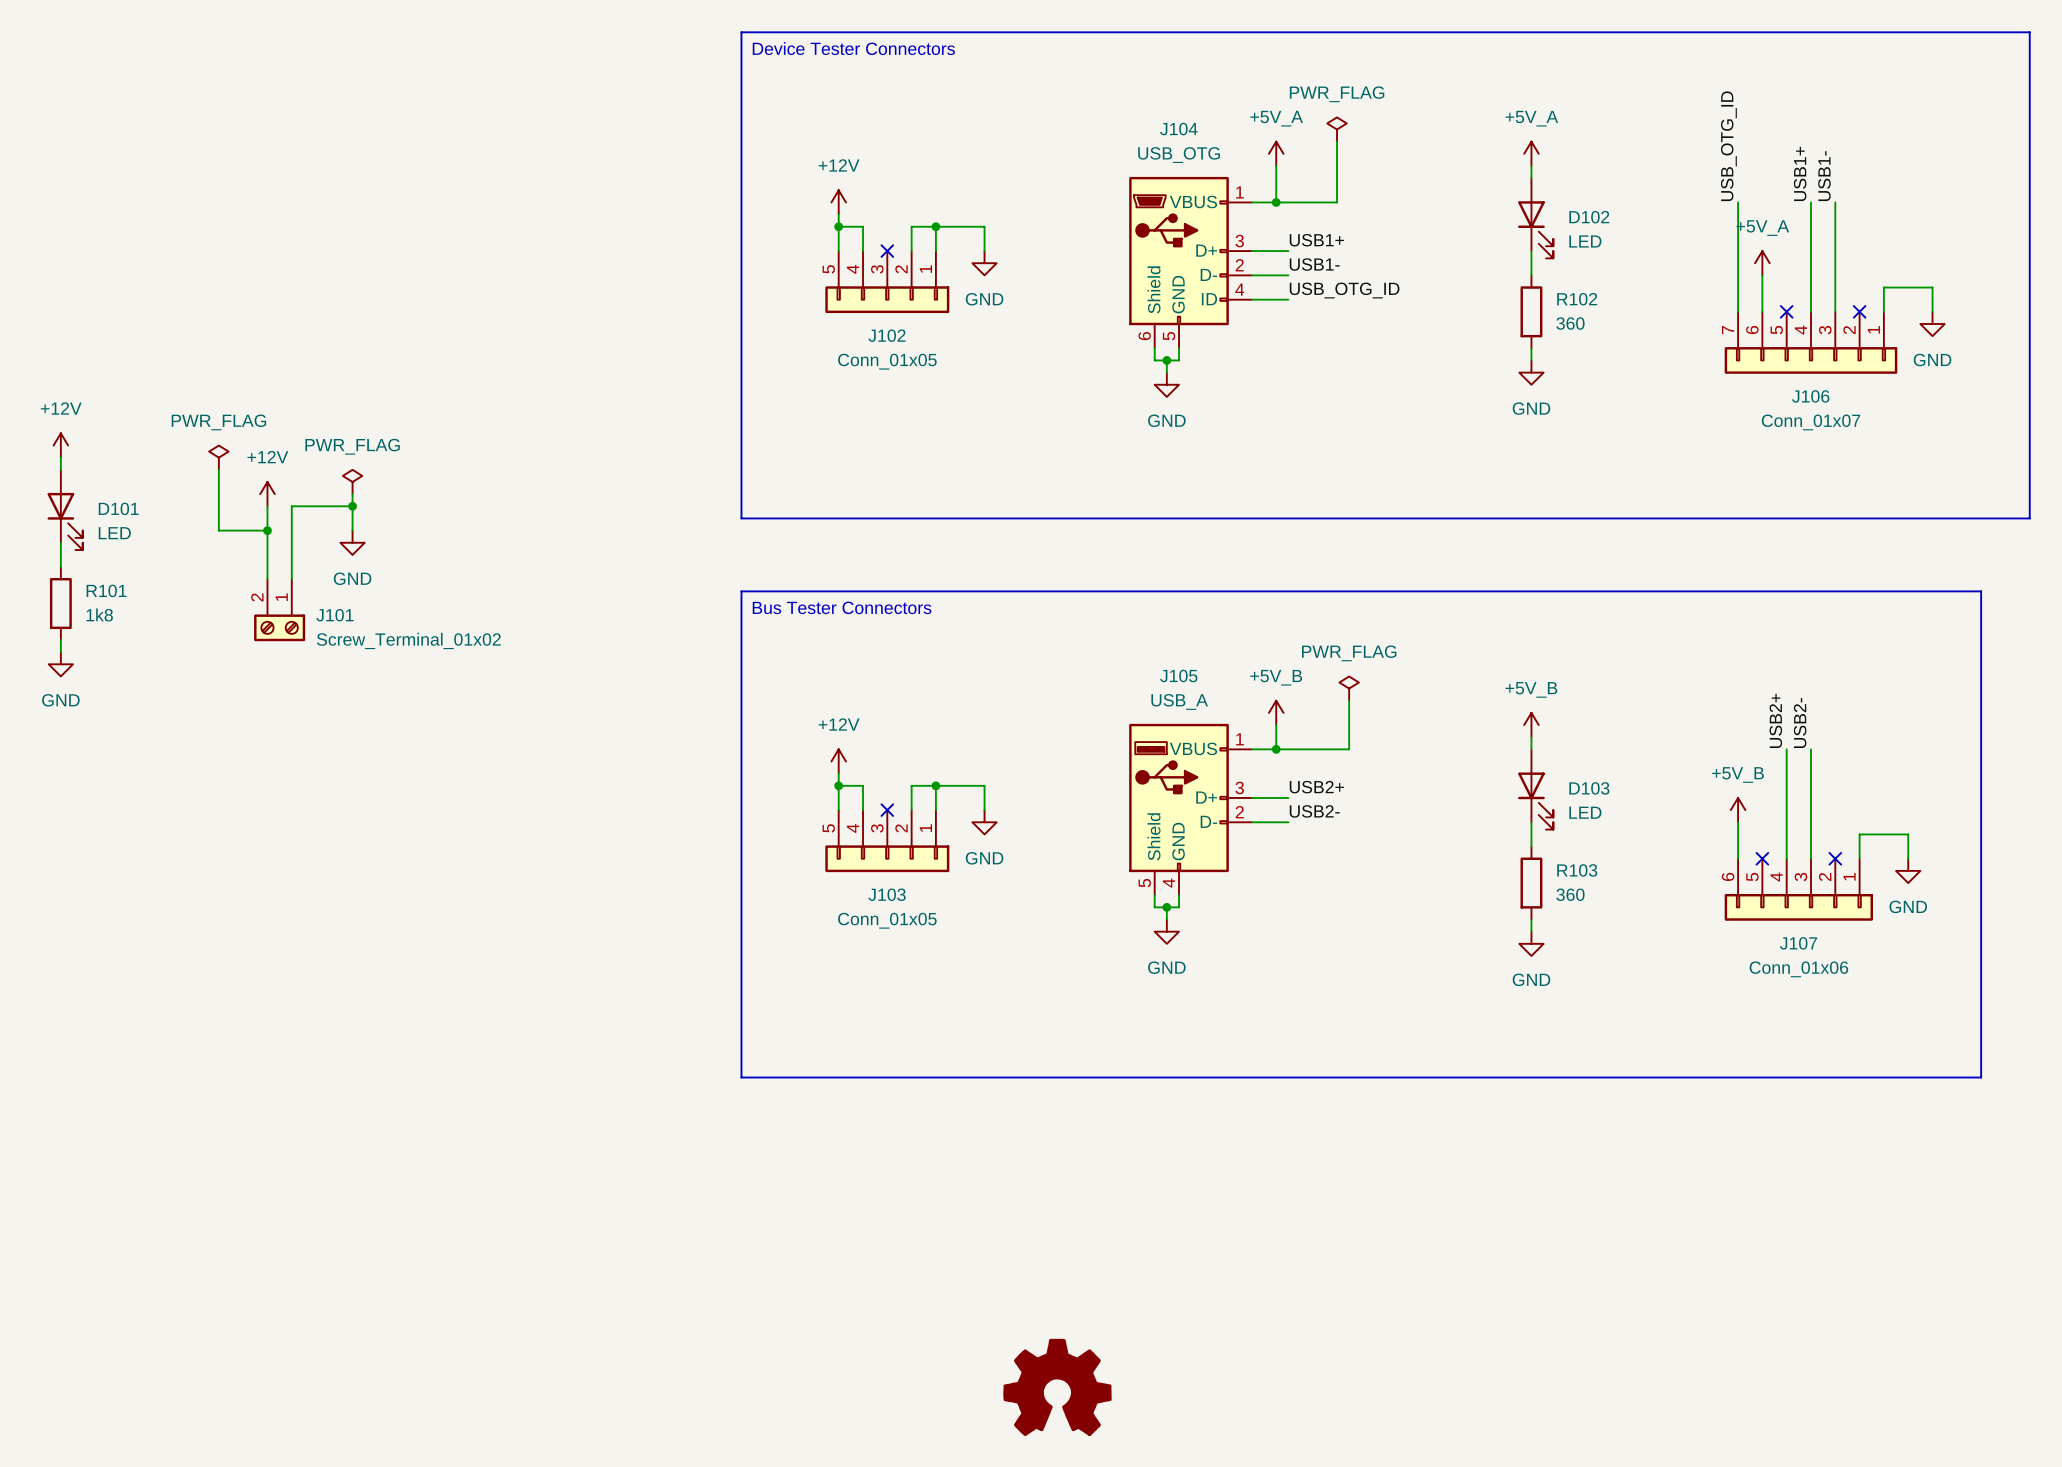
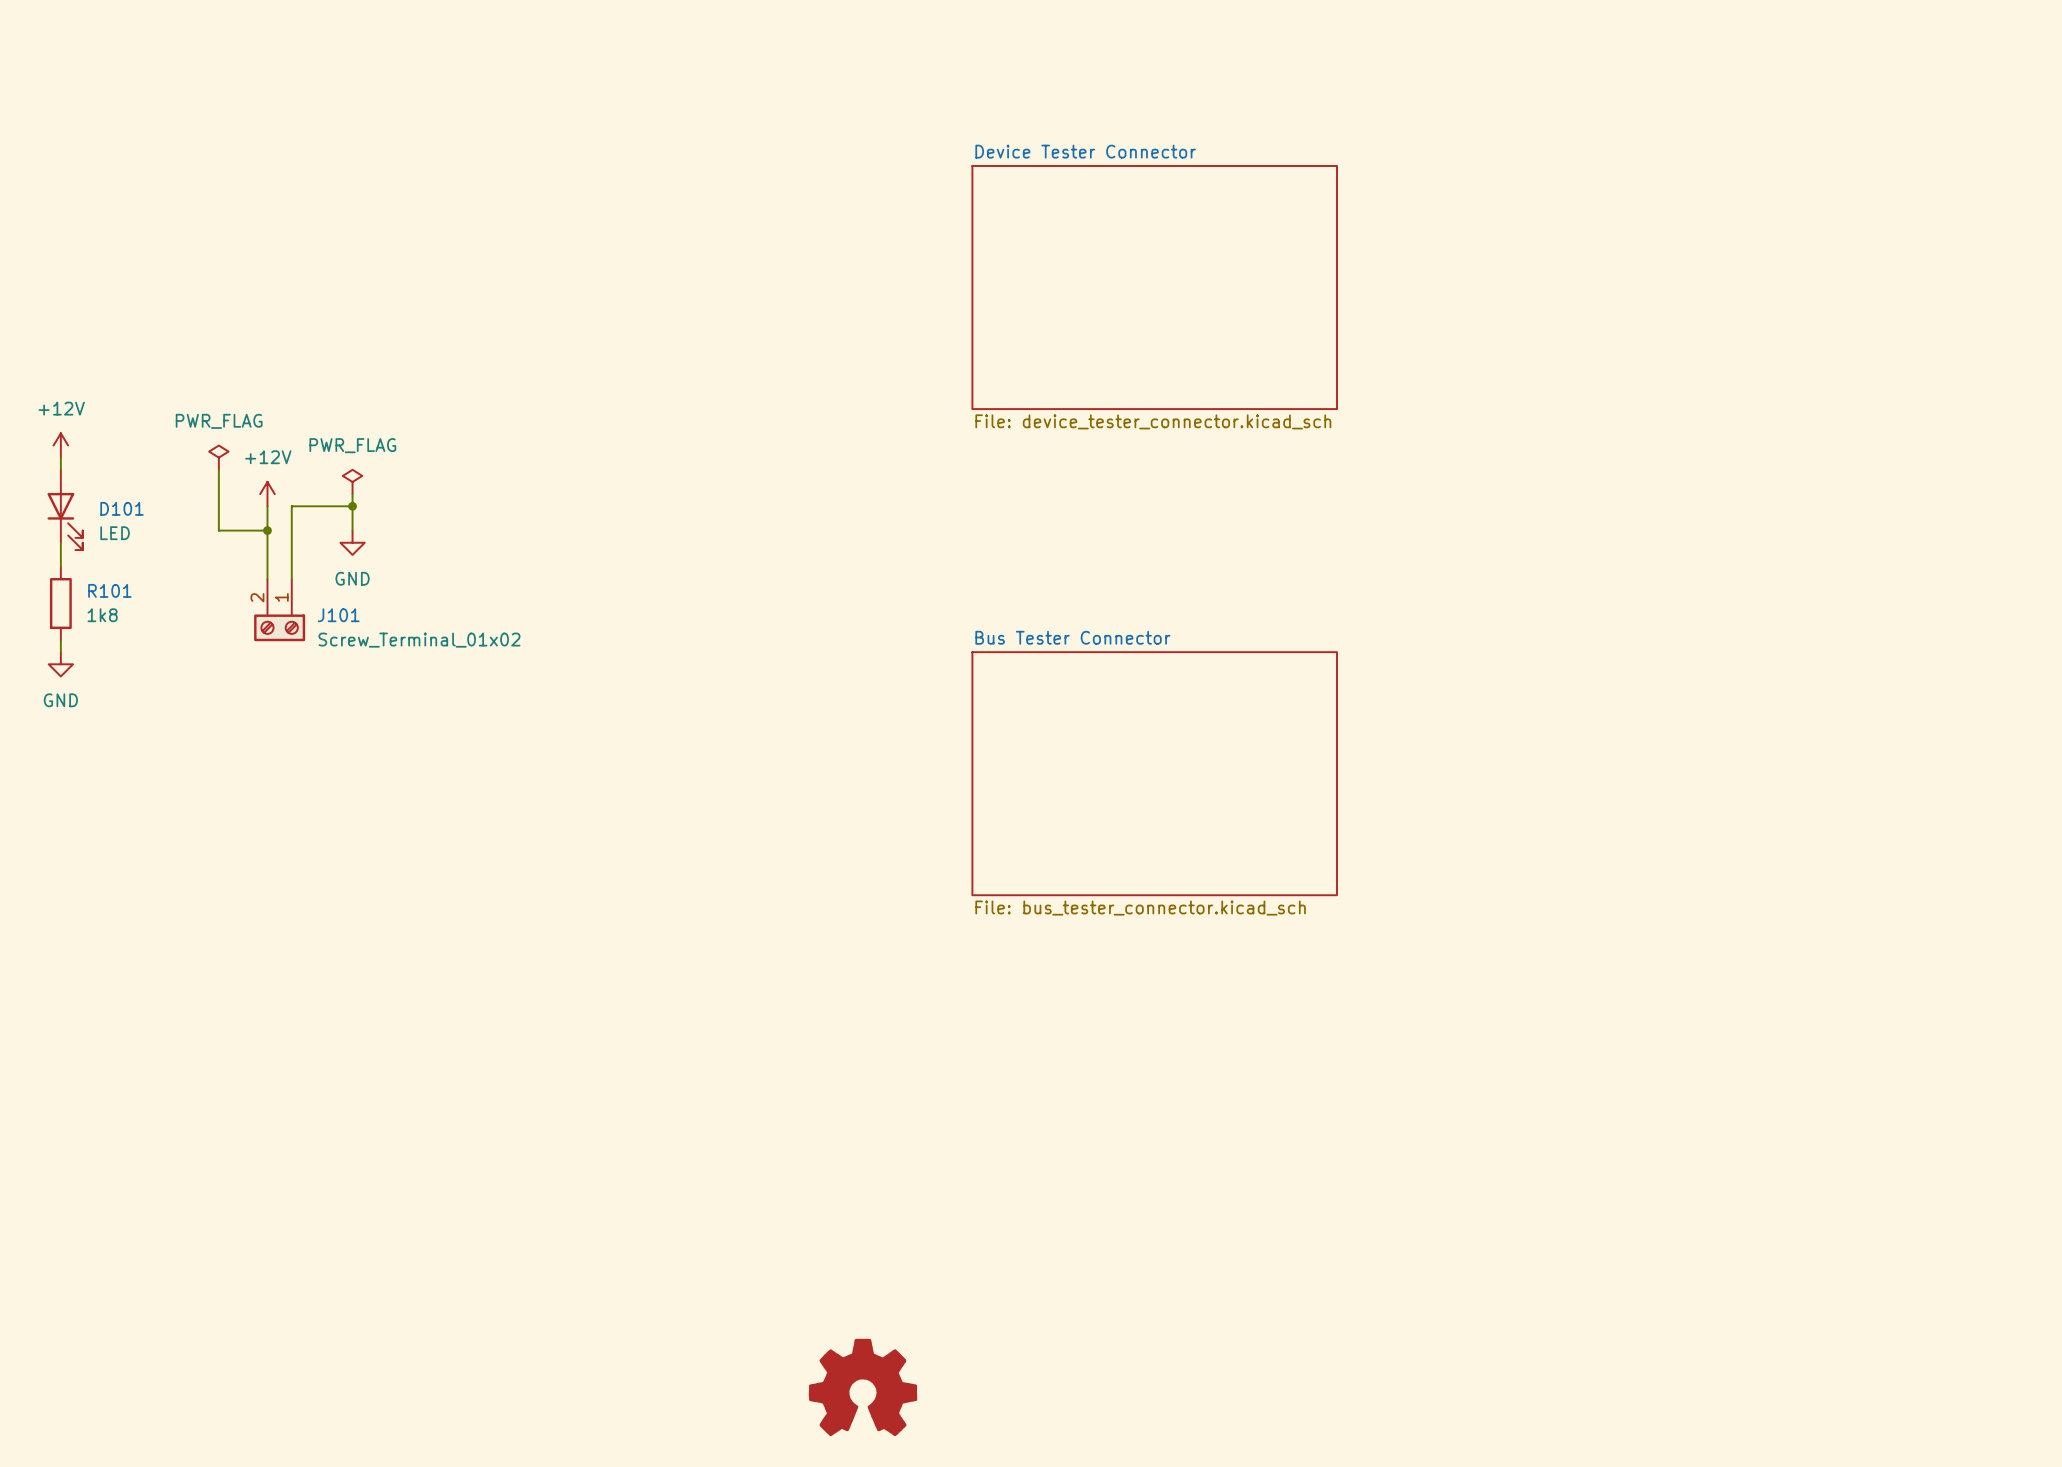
line: (741, 32) (741, 518) (2029, 518) (2029, 32) (741, 32) -> none
text: Device Tester Connectors (853, 48) -> none
power symbol: PWR_FLAG (1337, 129) -> none
wire: (1337, 141) (1337, 202) (1251, 202) -> none
label: USB_OTG_ID (1728, 146) -> none
power symbol: +5V_A (1276, 153) -> none
power symbol: +5V_A (1531, 153) -> none
wire: (1276, 165) (1276, 202) -> none
wire: (1531, 165) (1531, 178) -> none
label: USB1+ (1800, 173) -> none
label: USB1- (1824, 176) -> none
power symbol: +12V (838, 202) -> none
junction: (1276, 202) -> none
wire: (1738, 202) (1738, 311) -> none
wire: (1810, 202) (1810, 311) -> none
wire: (1835, 202) (1835, 311) -> none
wire: (838, 214) (838, 251) -> none
D102: LED (1535, 218) -> none
wire: (838, 226) (863, 226) (863, 251) -> none
junction: (838, 226) -> none
wire: (935, 226) (935, 251) -> none
junction: (935, 226) -> none
label: USB1+ (1316, 240) -> none
no-connect mark: (887, 251) -> none
wire: (911, 251) (911, 226) (984, 226) (984, 251) -> none
wire: (1251, 251) (1288, 251) -> none
wire: (1531, 251) (1531, 275) -> none
J104: USB_OTG (1190, 262) -> none
power symbol: GND (984, 263) -> none
power symbol: +5V_A (1762, 263) -> none
label: USB1- (1314, 264) -> none
wire: (1251, 275) (1288, 275) -> none
wire: (1762, 275) (1762, 311) -> none
J102: Conn_01x05 (887, 282) -> none
sheet Device Tester Connector: none -> File: device_tester_connector.kicad_sch (1154, 287)
label: USB_OTG_ID (1344, 290) -> none
wire: (1251, 299) (1288, 299) -> none
R102: 360 (1531, 311) -> none
no-connect mark: (1786, 311) -> none
no-connect mark: (1859, 311) -> none
wire: (1883, 311) (1883, 287) (1932, 287) (1932, 311) -> none
power symbol: GND (1932, 323) -> none
J106: Conn_01x07 (1810, 342) -> none
wire: (1154, 348) (1154, 360) (1179, 360) (1179, 348) -> none
wire: (1531, 348) (1531, 360) -> none
wire: (1166, 360) (1166, 372) -> none
junction: (1166, 360) -> none
power symbol: GND (1531, 372) -> none
power symbol: GND (1166, 384) -> none
line: (741, 591) (1981, 591) (1981, 1077) (741, 1077) (741, 591) -> none
text: Bus Tester Connectors (842, 607) -> none
power symbol: PWR_FLAG (1349, 688) -> none
wire: (1349, 700) (1349, 749) (1251, 749) -> none
power symbol: +5V_B (1276, 712) -> none
label: USB2+ (1775, 720) -> none
label: USB2- (1800, 723) -> none
wire: (1276, 725) (1276, 749) -> none
power symbol: +5V_B (1531, 725) -> none
wire: (1531, 737) (1531, 749) -> none
junction: (1276, 749) -> none
wire: (1786, 749) (1786, 858) -> none
wire: (1810, 749) (1810, 858) -> none
power symbol: +12V (838, 761) -> none
wire: (838, 773) (838, 810) -> none
sheet Bus Tester Connector: none -> File: bus_tester_connector.kicad_sch (1154, 773)
wire: (838, 785) (863, 785) (863, 810) -> none
junction: (838, 785) -> none
wire: (935, 785) (935, 810) -> none
junction: (935, 785) -> none
label: USB2+ (1316, 787) -> none
D103: LED (1535, 789) -> none
wire: (1251, 797) (1288, 797) -> none
J105: USB_A (1190, 809) -> none
no-connect mark: (887, 810) -> none
wire: (911, 810) (911, 785) (984, 785) (984, 810) -> none
power symbol: +5V_B (1738, 810) -> none
label: USB2- (1314, 811) -> none
power symbol: GND (984, 822) -> none
wire: (1251, 822) (1288, 822) -> none
wire: (1531, 822) (1531, 846) -> none
wire: (1738, 822) (1738, 858) -> none
J103: Conn_01x05 (887, 841) -> none
no-connect mark: (1762, 858) -> none
no-connect mark: (1835, 858) -> none
wire: (1859, 858) (1859, 834) (1908, 834) (1908, 858) -> none
power symbol: GND (1908, 870) -> none
R103: 360 (1531, 883) -> none
J107: Conn_01x06 (1798, 889) -> none
wire: (1154, 895) (1154, 907) (1179, 907) (1179, 895) -> none
wire: (1166, 907) (1166, 919) -> none
junction: (1166, 907) -> none
wire: (1531, 919) (1531, 931) -> none
power symbol: GND (1166, 931) -> none
power symbol: GND (1531, 943) -> none
power symbol position: (1057, 1387) -> (863, 1387)

